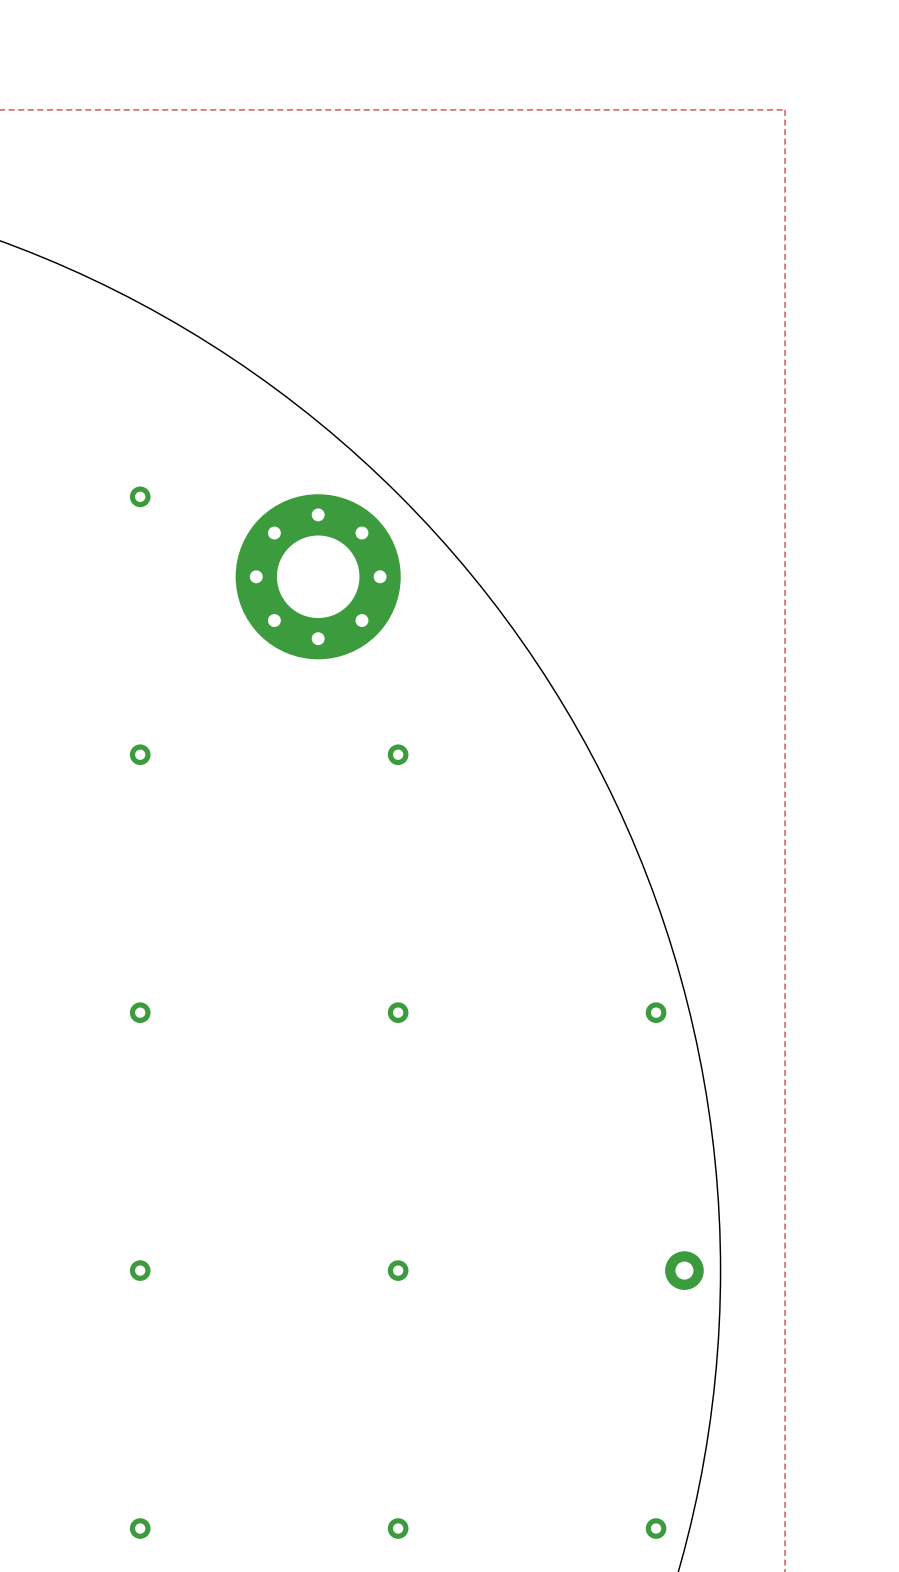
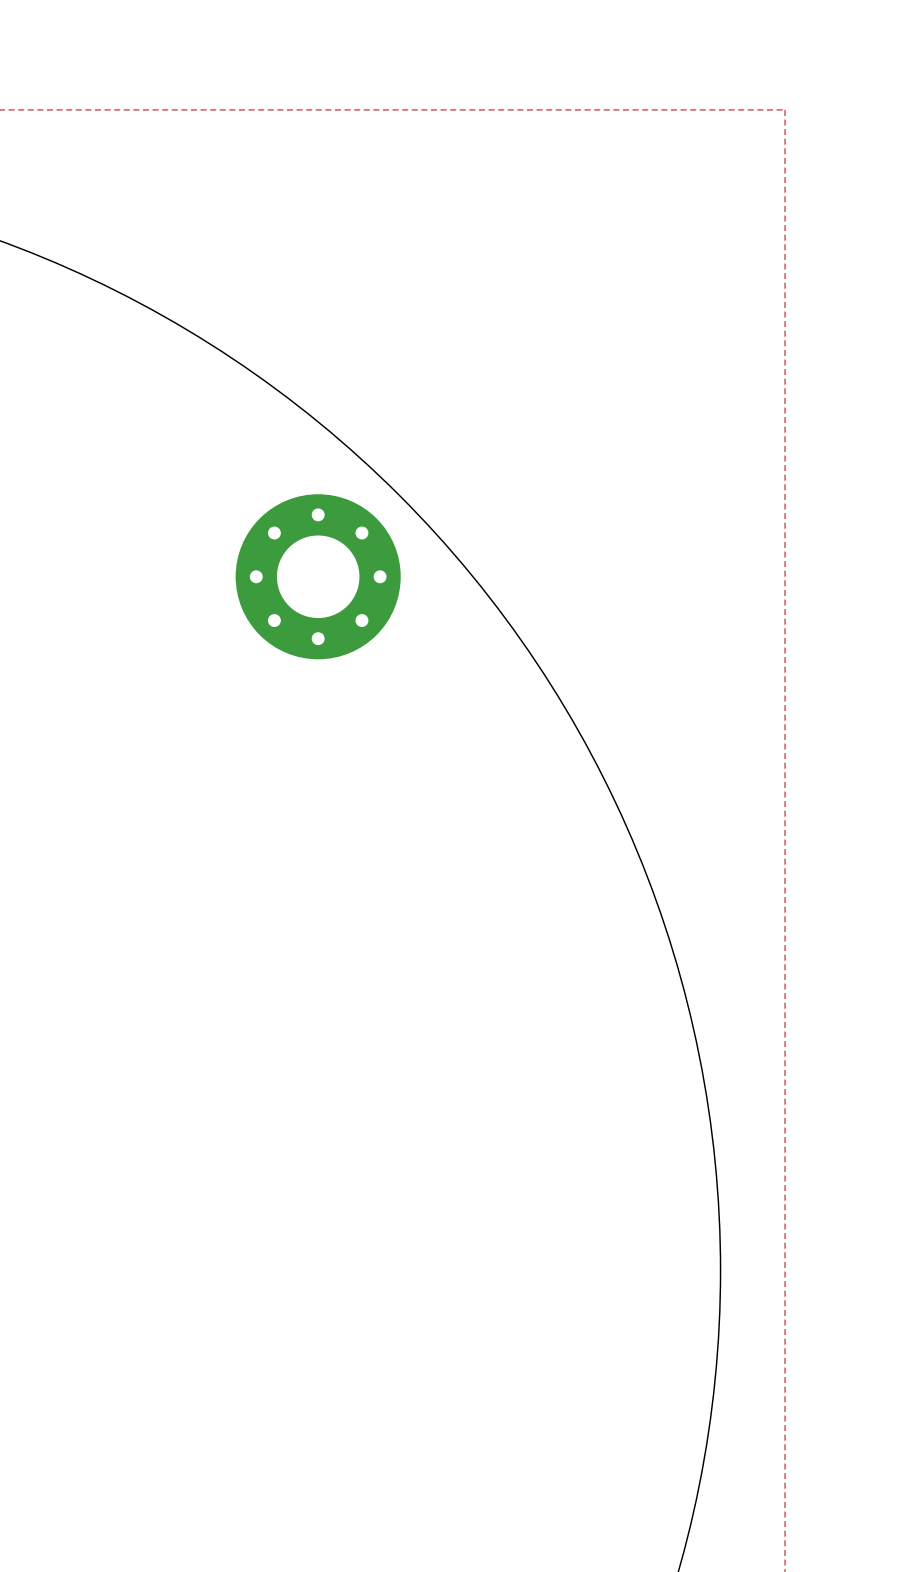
via: (140, 496) -> none
via: (140, 754) -> none
via: (398, 754) -> none
via: (140, 1012) -> none
via: (398, 1012) -> none
via: (656, 1012) -> none
via: (140, 1270) -> none
via: (398, 1270) -> none
part: (684, 1270) -> none
via: (140, 1528) -> none
via: (398, 1528) -> none
via: (656, 1528) -> none

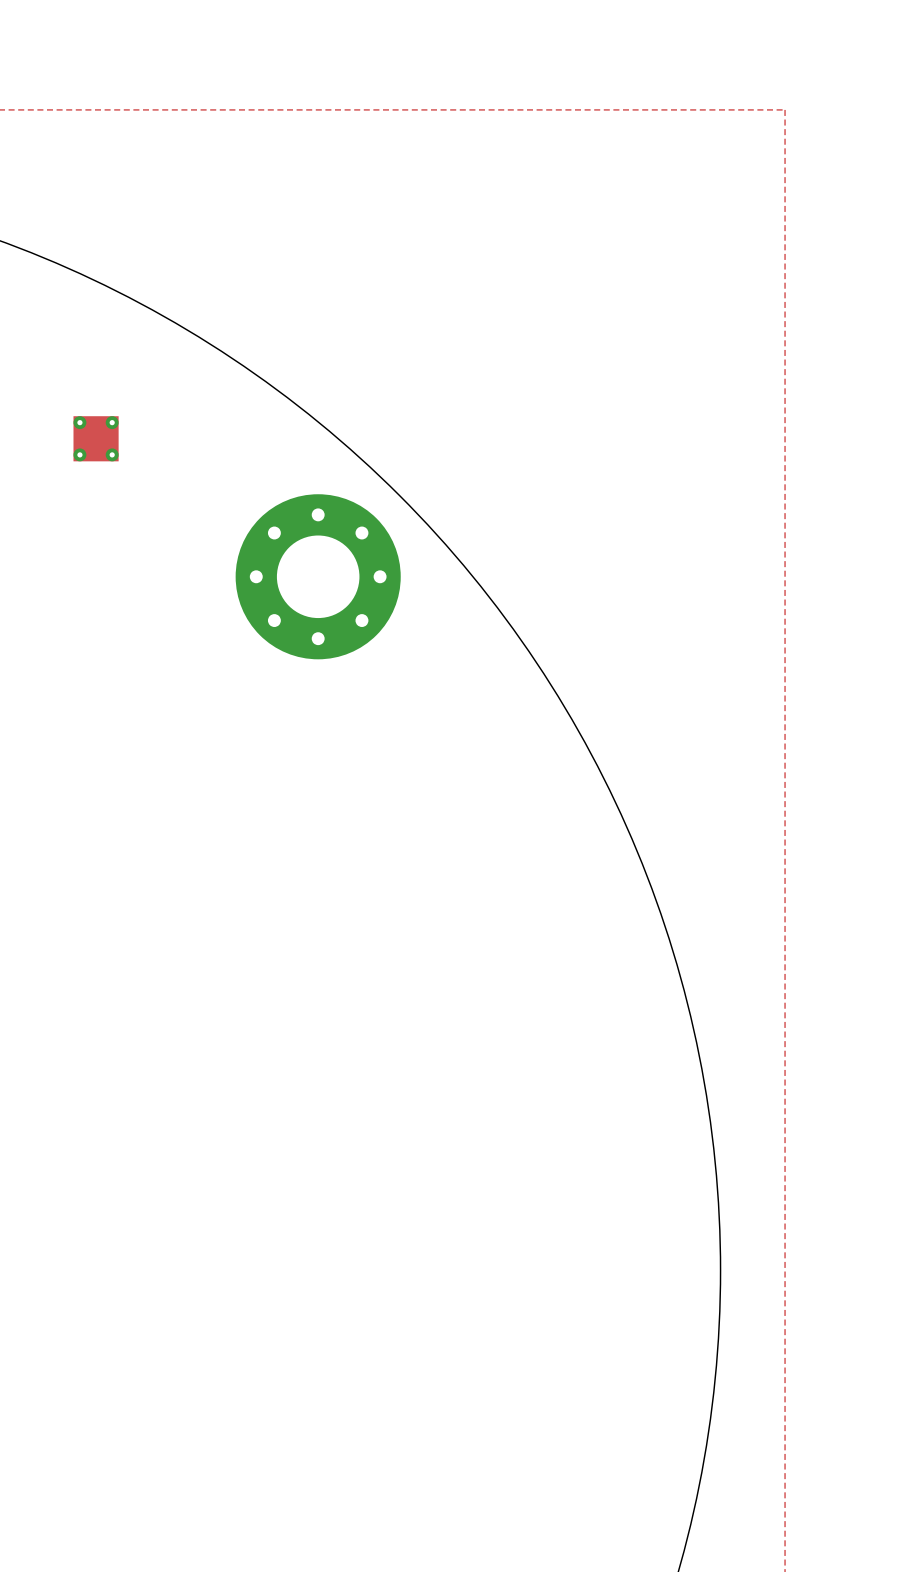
part: none -> (96, 438)

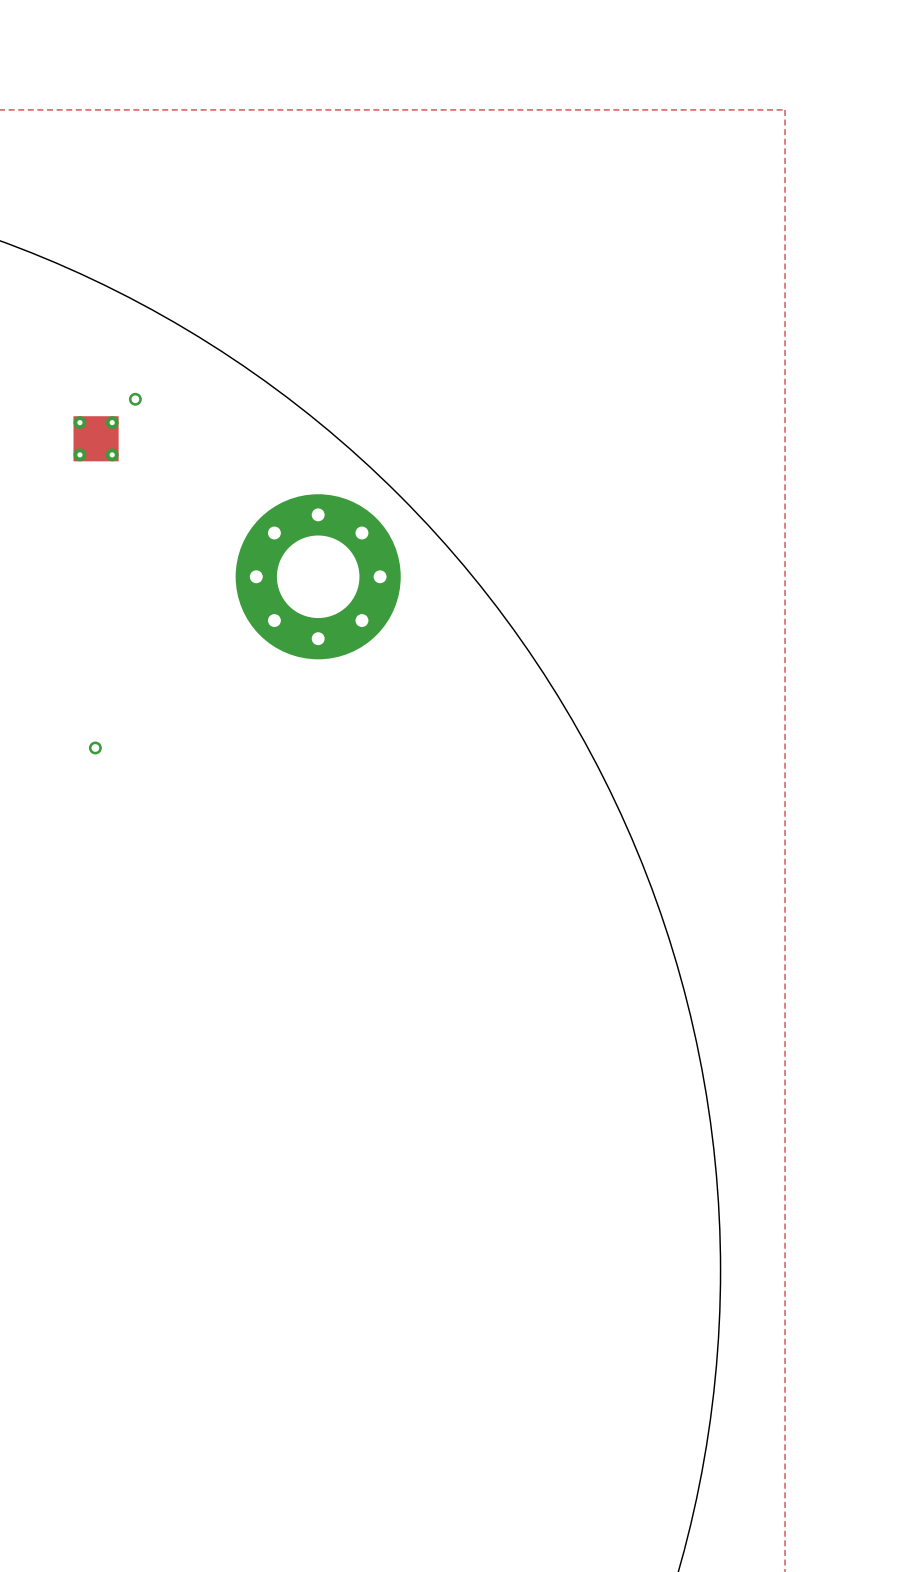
via: none -> (135, 399)
via: none -> (95, 747)

